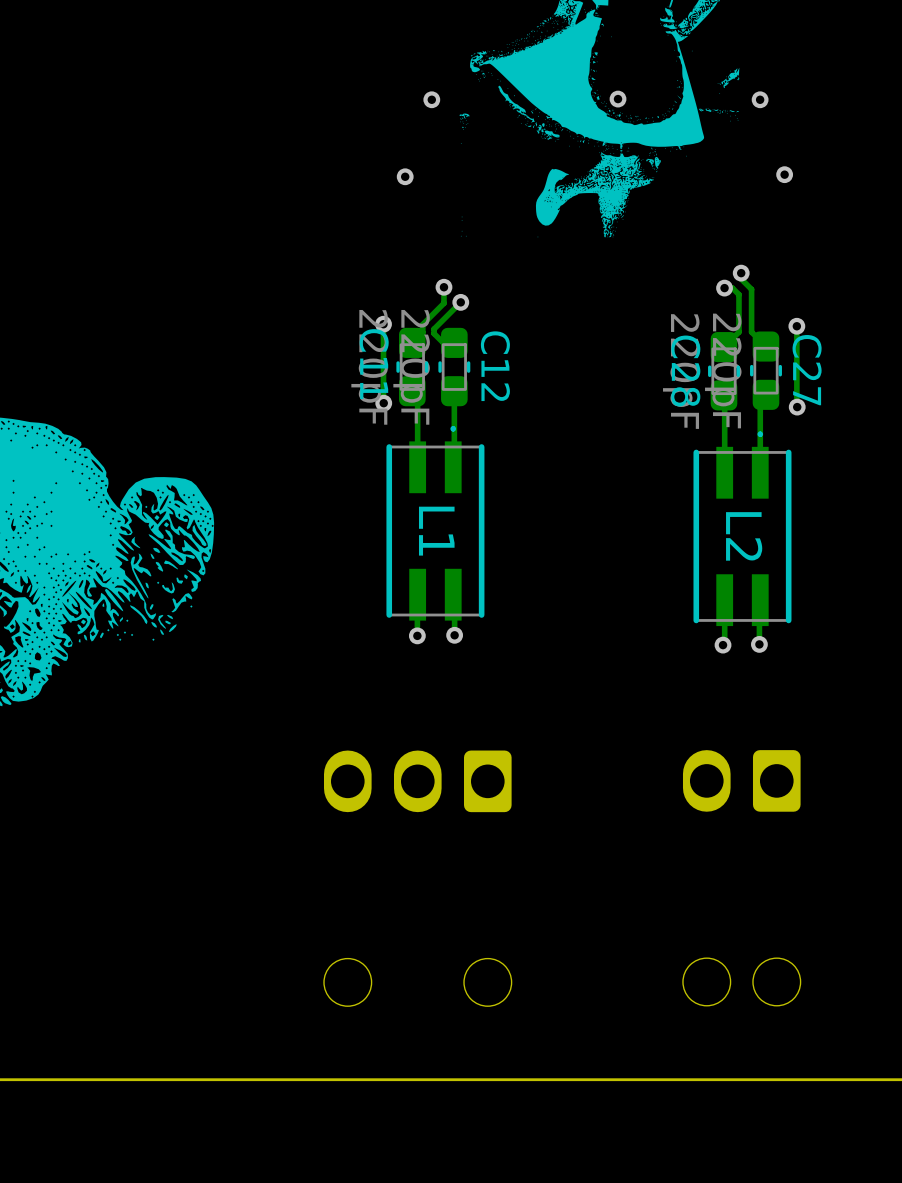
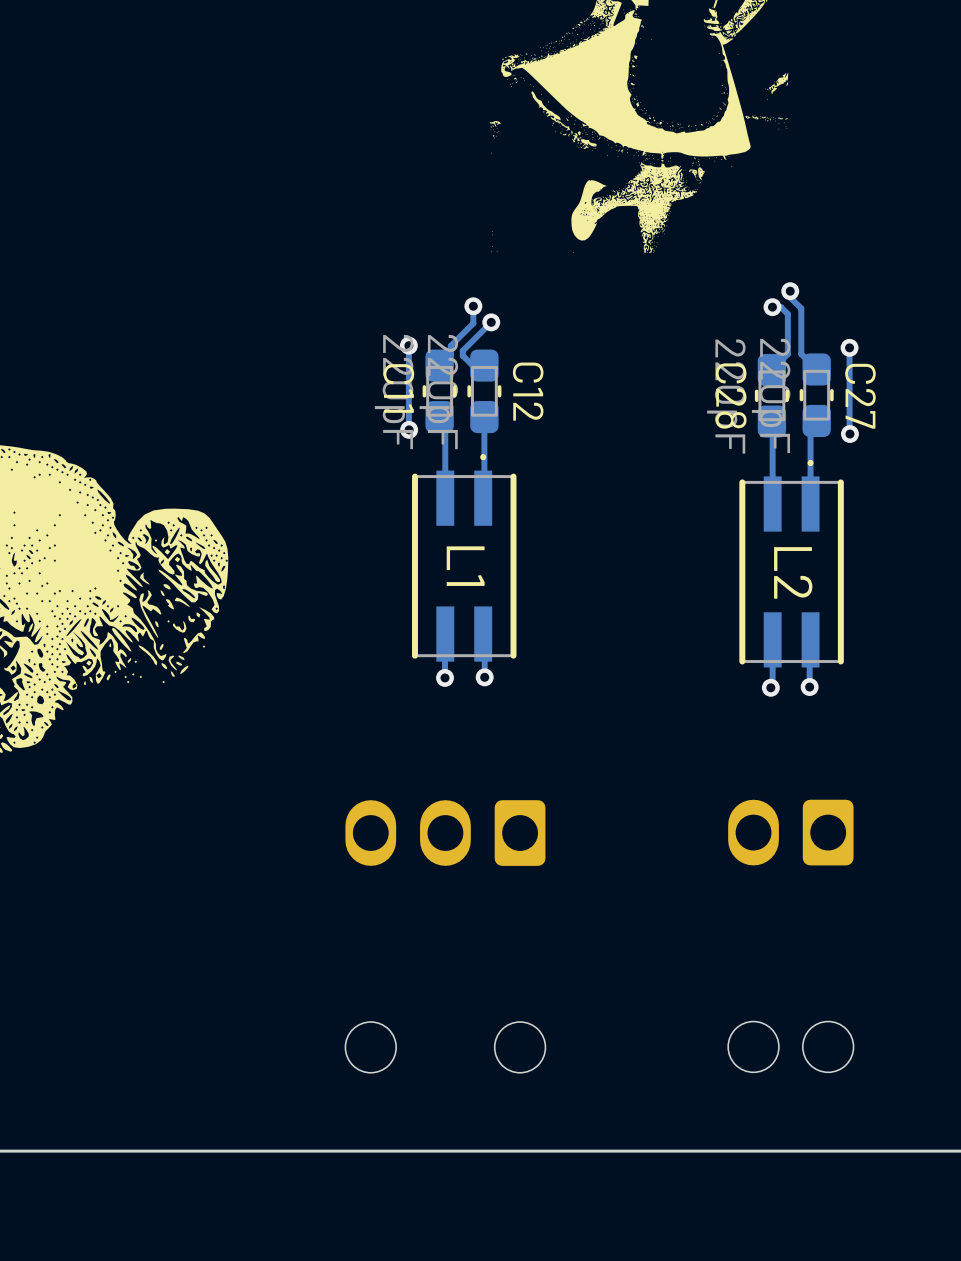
via: (431, 99) -> none
via: (618, 99) -> none
via: (760, 99) -> none
via: (784, 174) -> none
via: (405, 176) -> none

